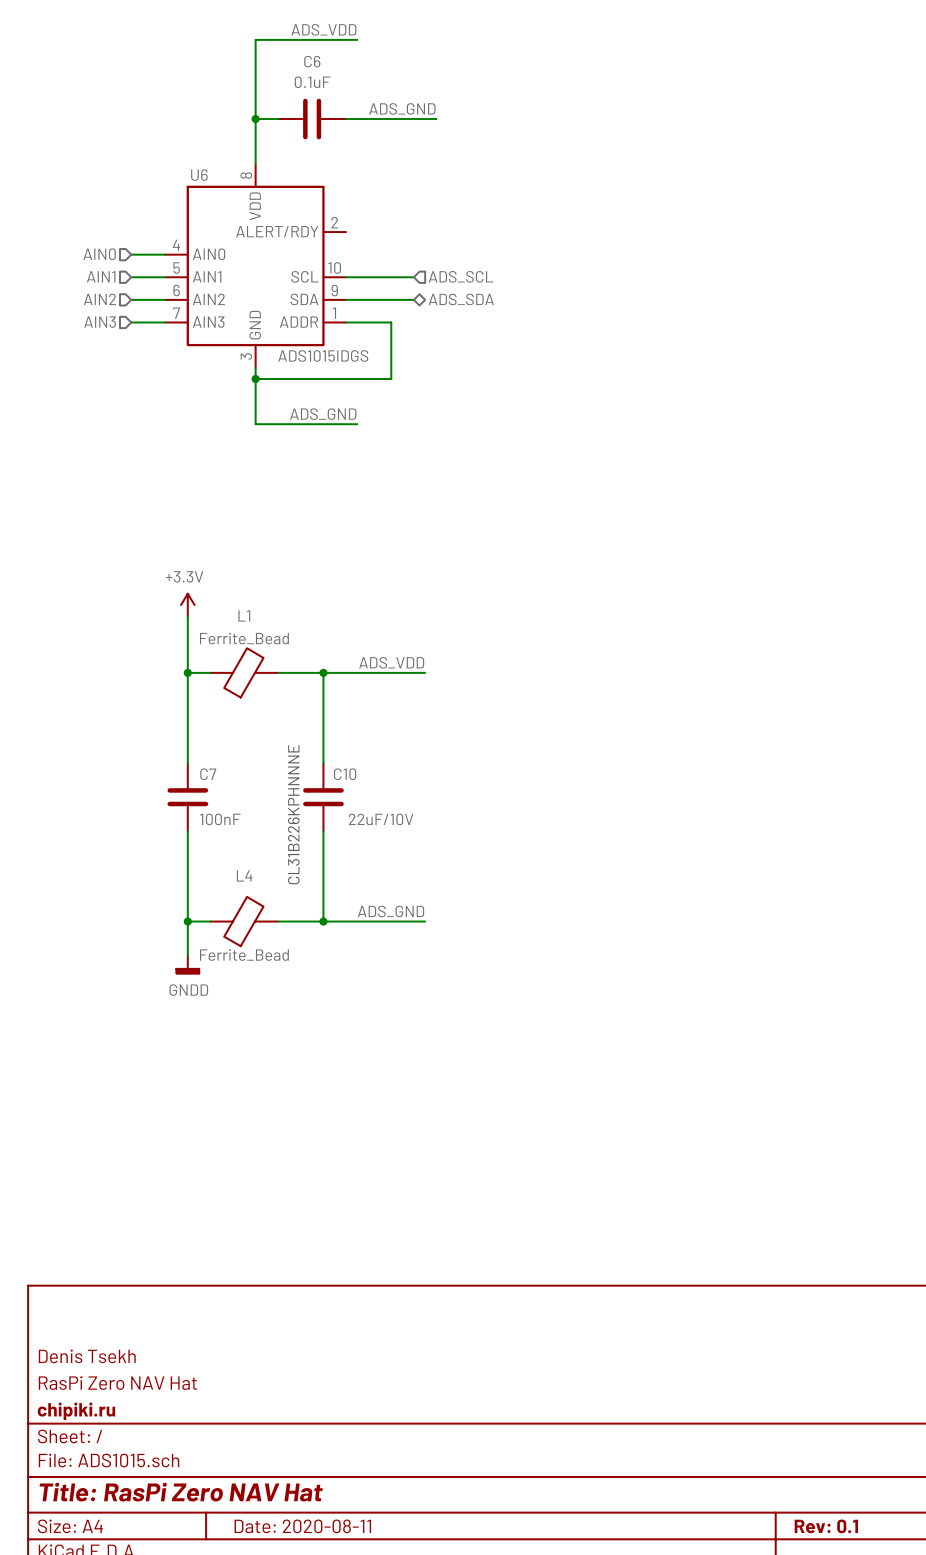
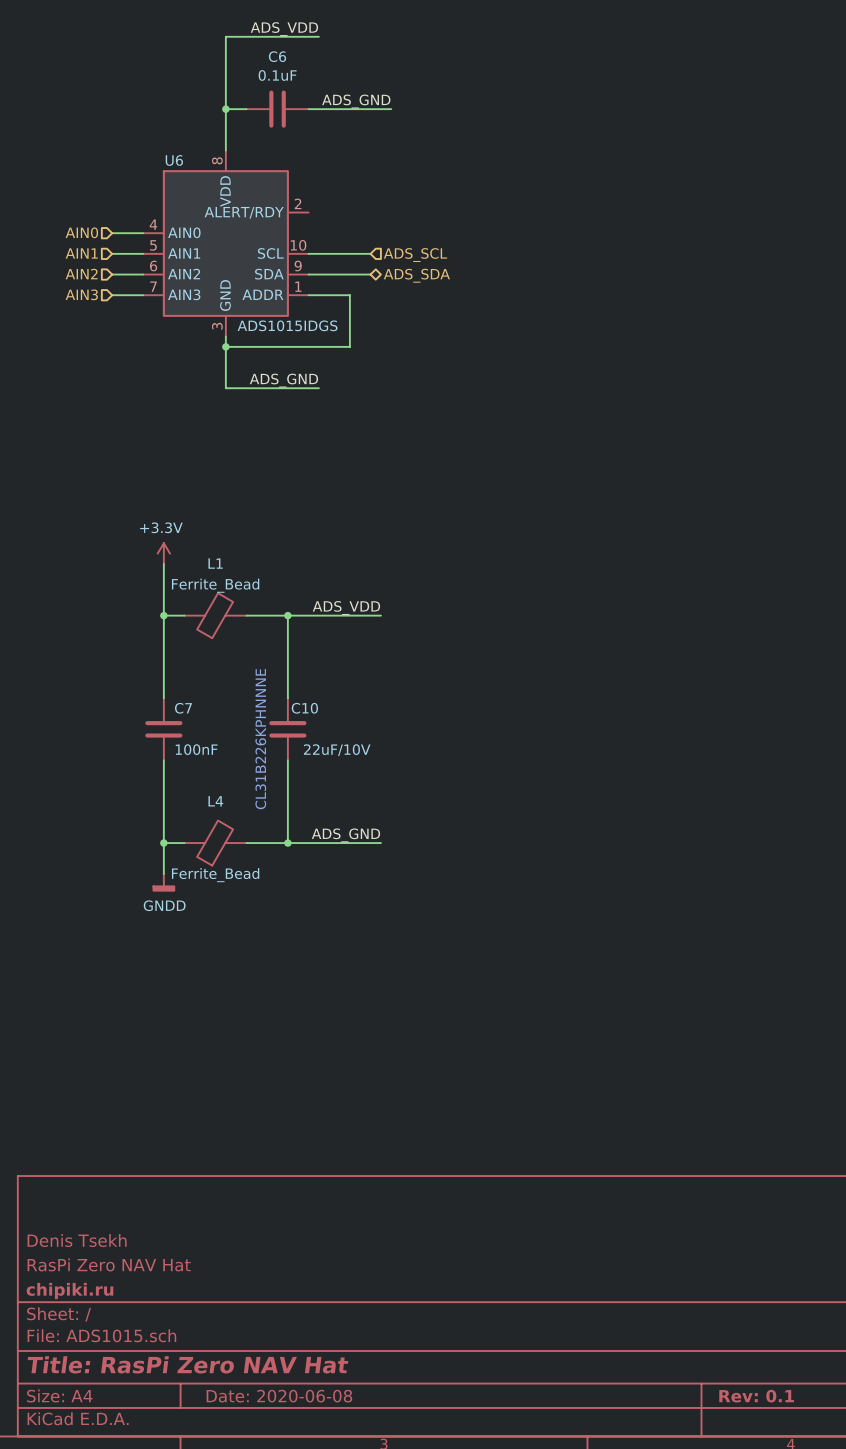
title block: Date: 2020-08-11 (302, 1526) -> Date: 2020-06-08 (279, 1396)

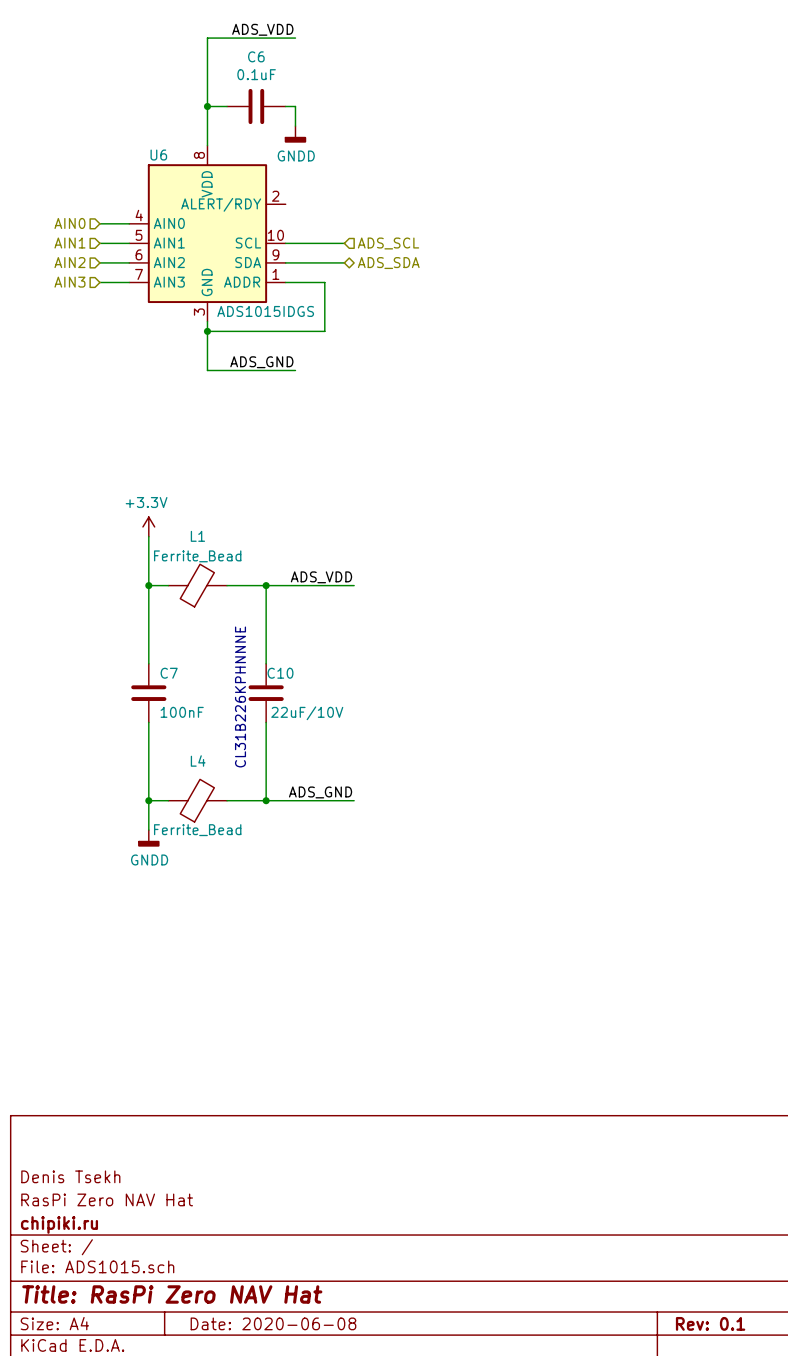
label: ADS_GND (356, 101) -> none
wire: (318, 109) (391, 109) -> (295, 106) (295, 126)
power symbol: none -> GNDD (295, 134)

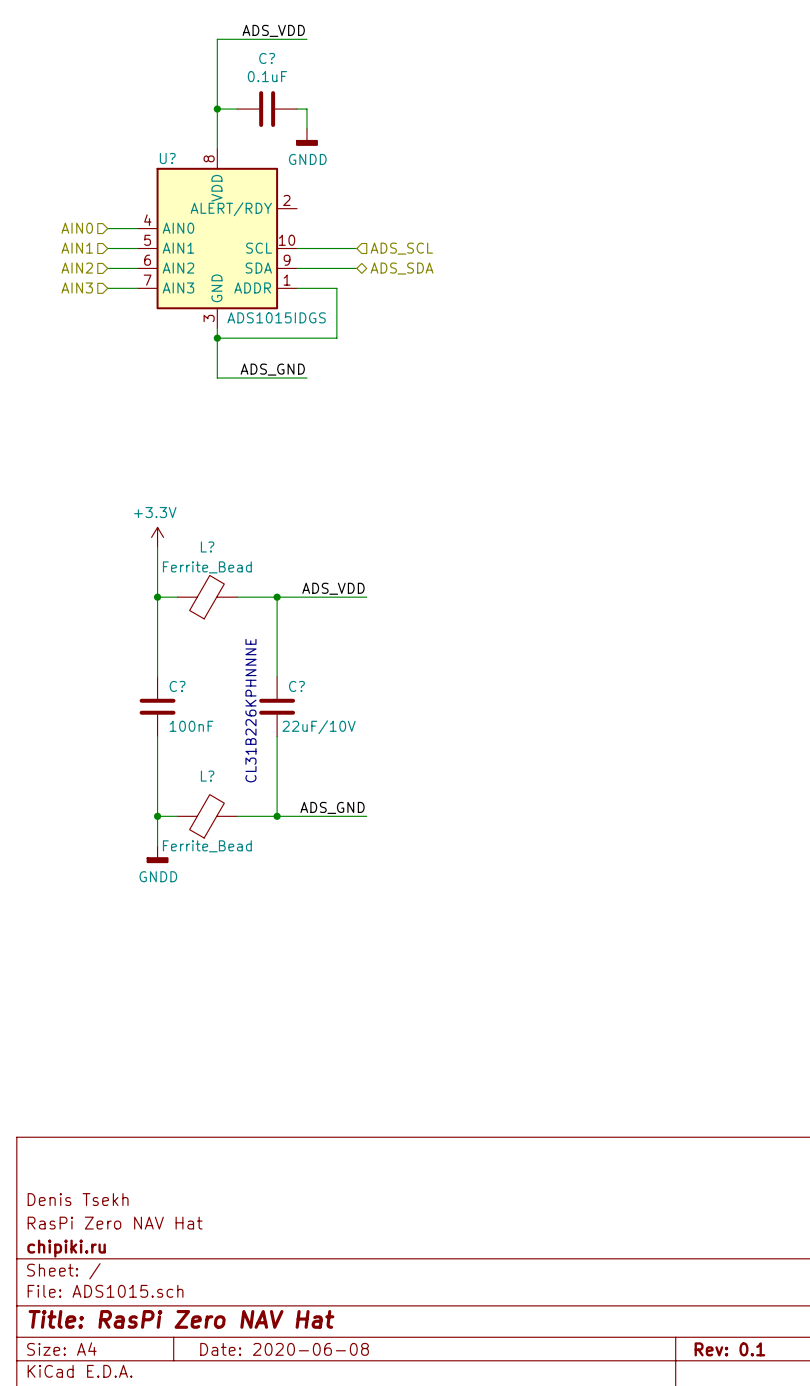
C6 name: C6 (256, 56) -> C? (267, 58)
U6 name: U6 (158, 155) -> U? (167, 158)
L1 name: L1 (197, 536) -> L? (207, 546)
C7 name: C7 (169, 673) -> C? (177, 686)
C10 name: C10 (280, 673) -> C? (296, 686)
L4 name: L4 (198, 761) -> L? (207, 776)

